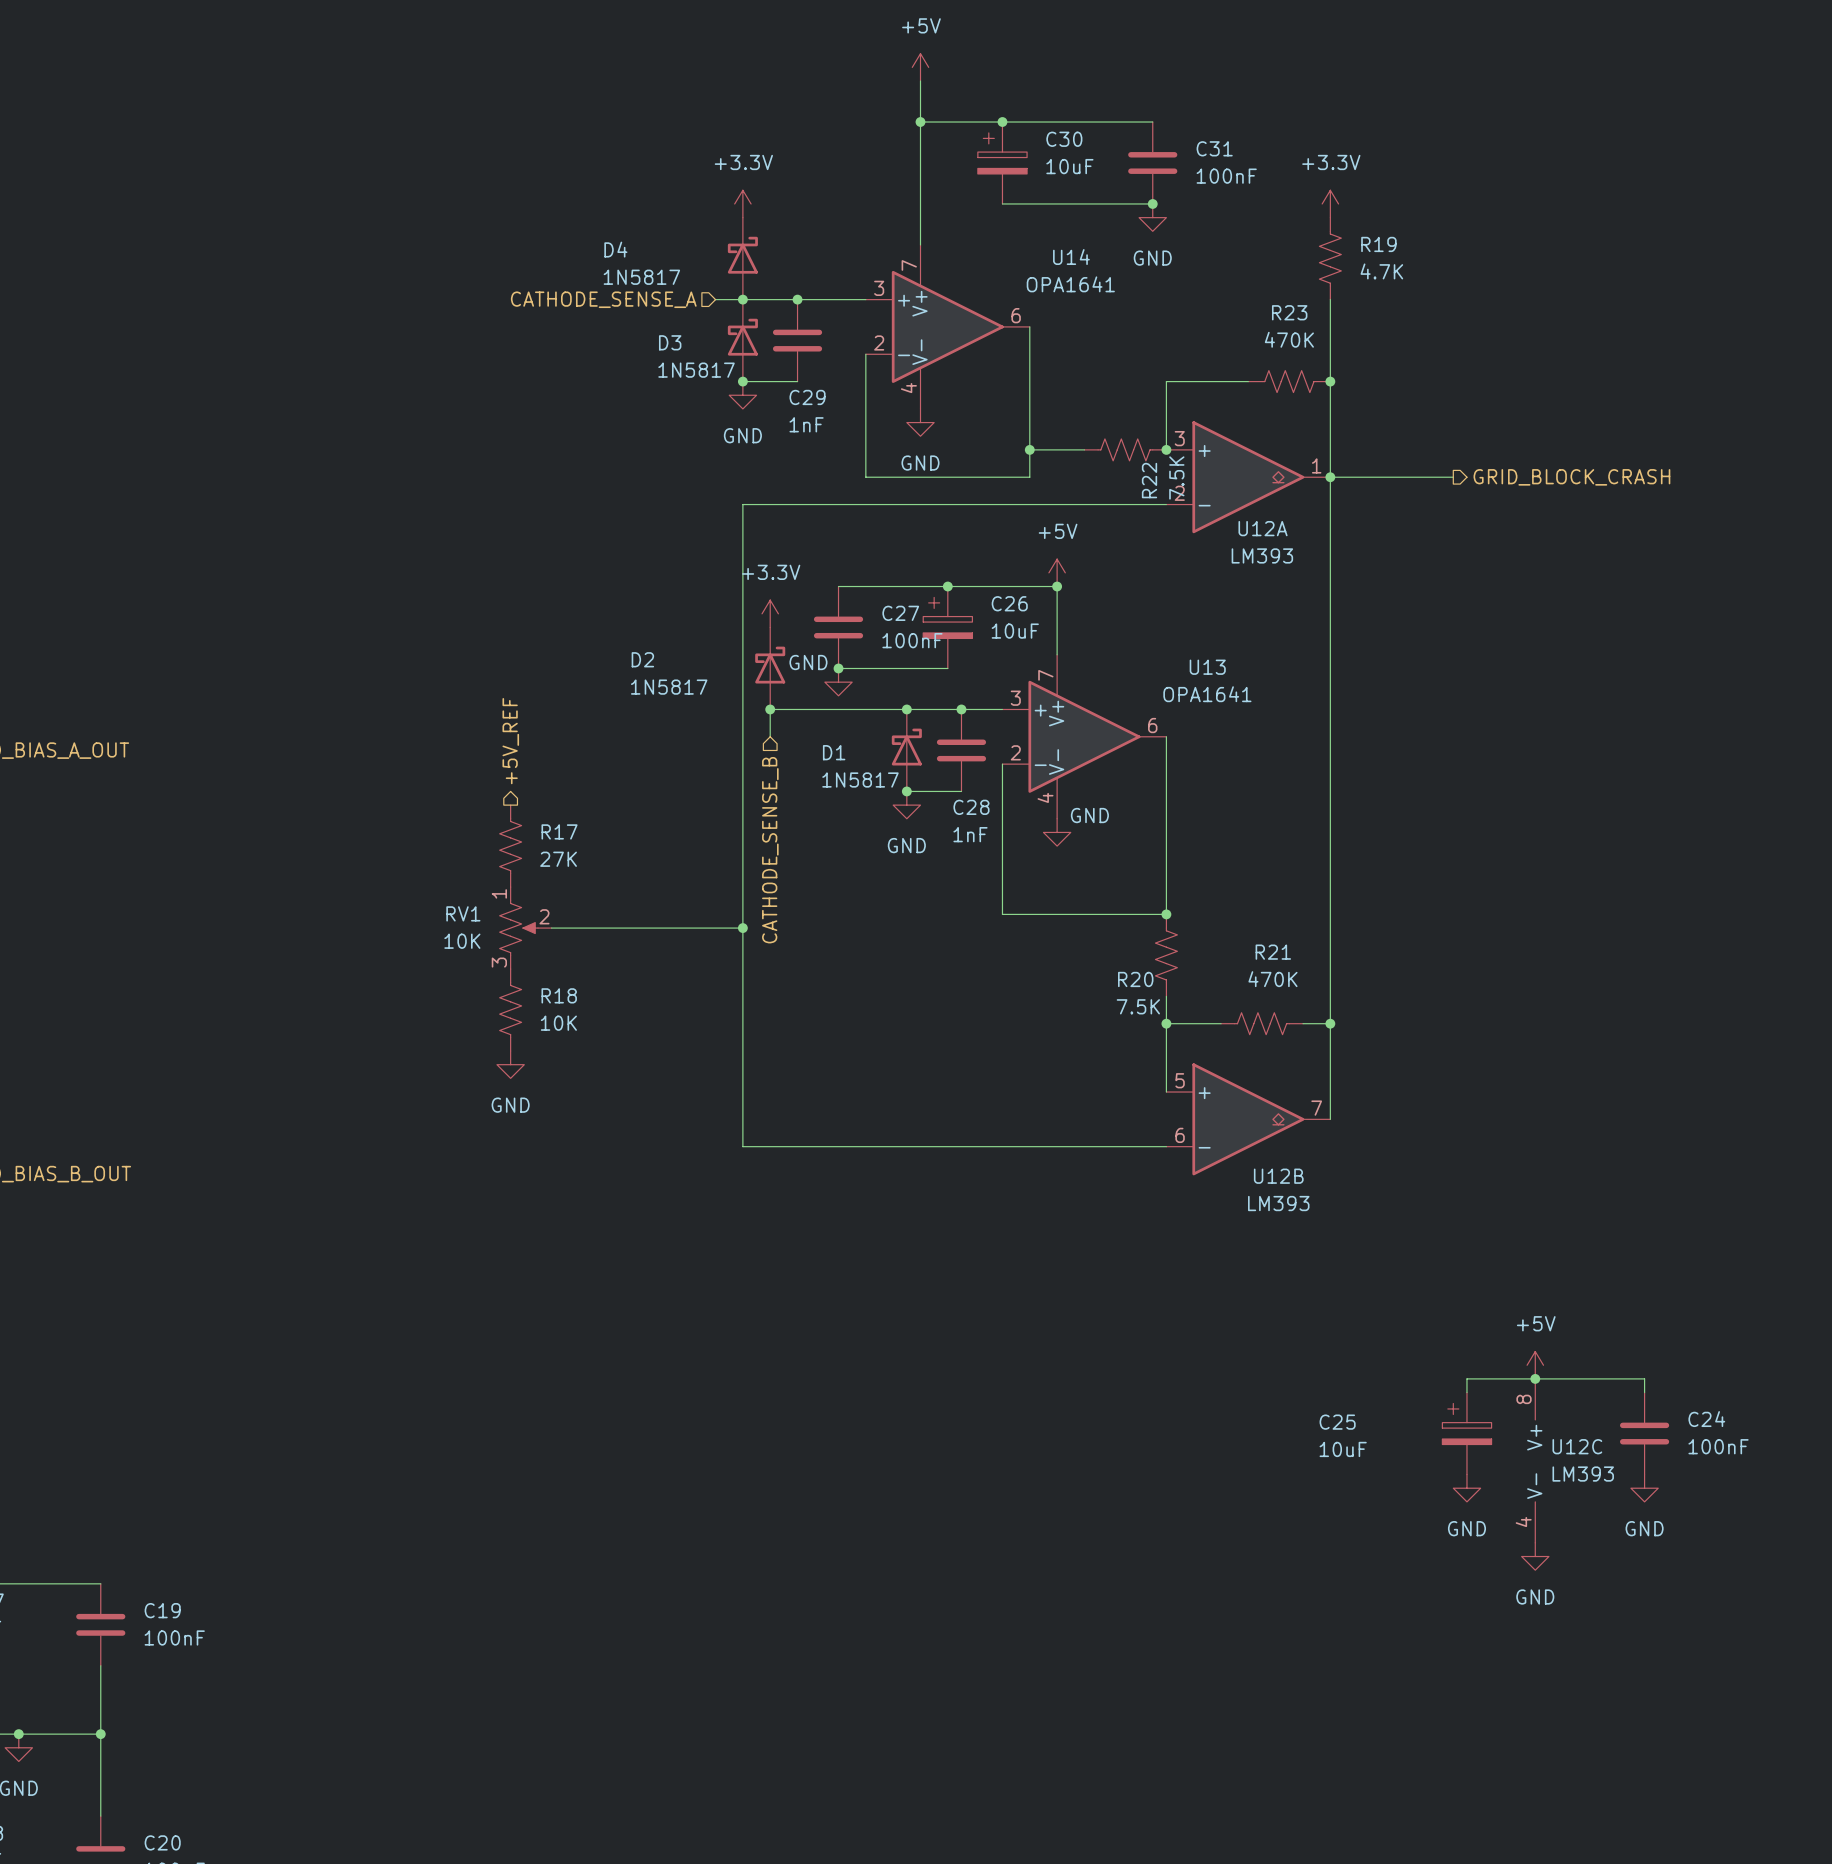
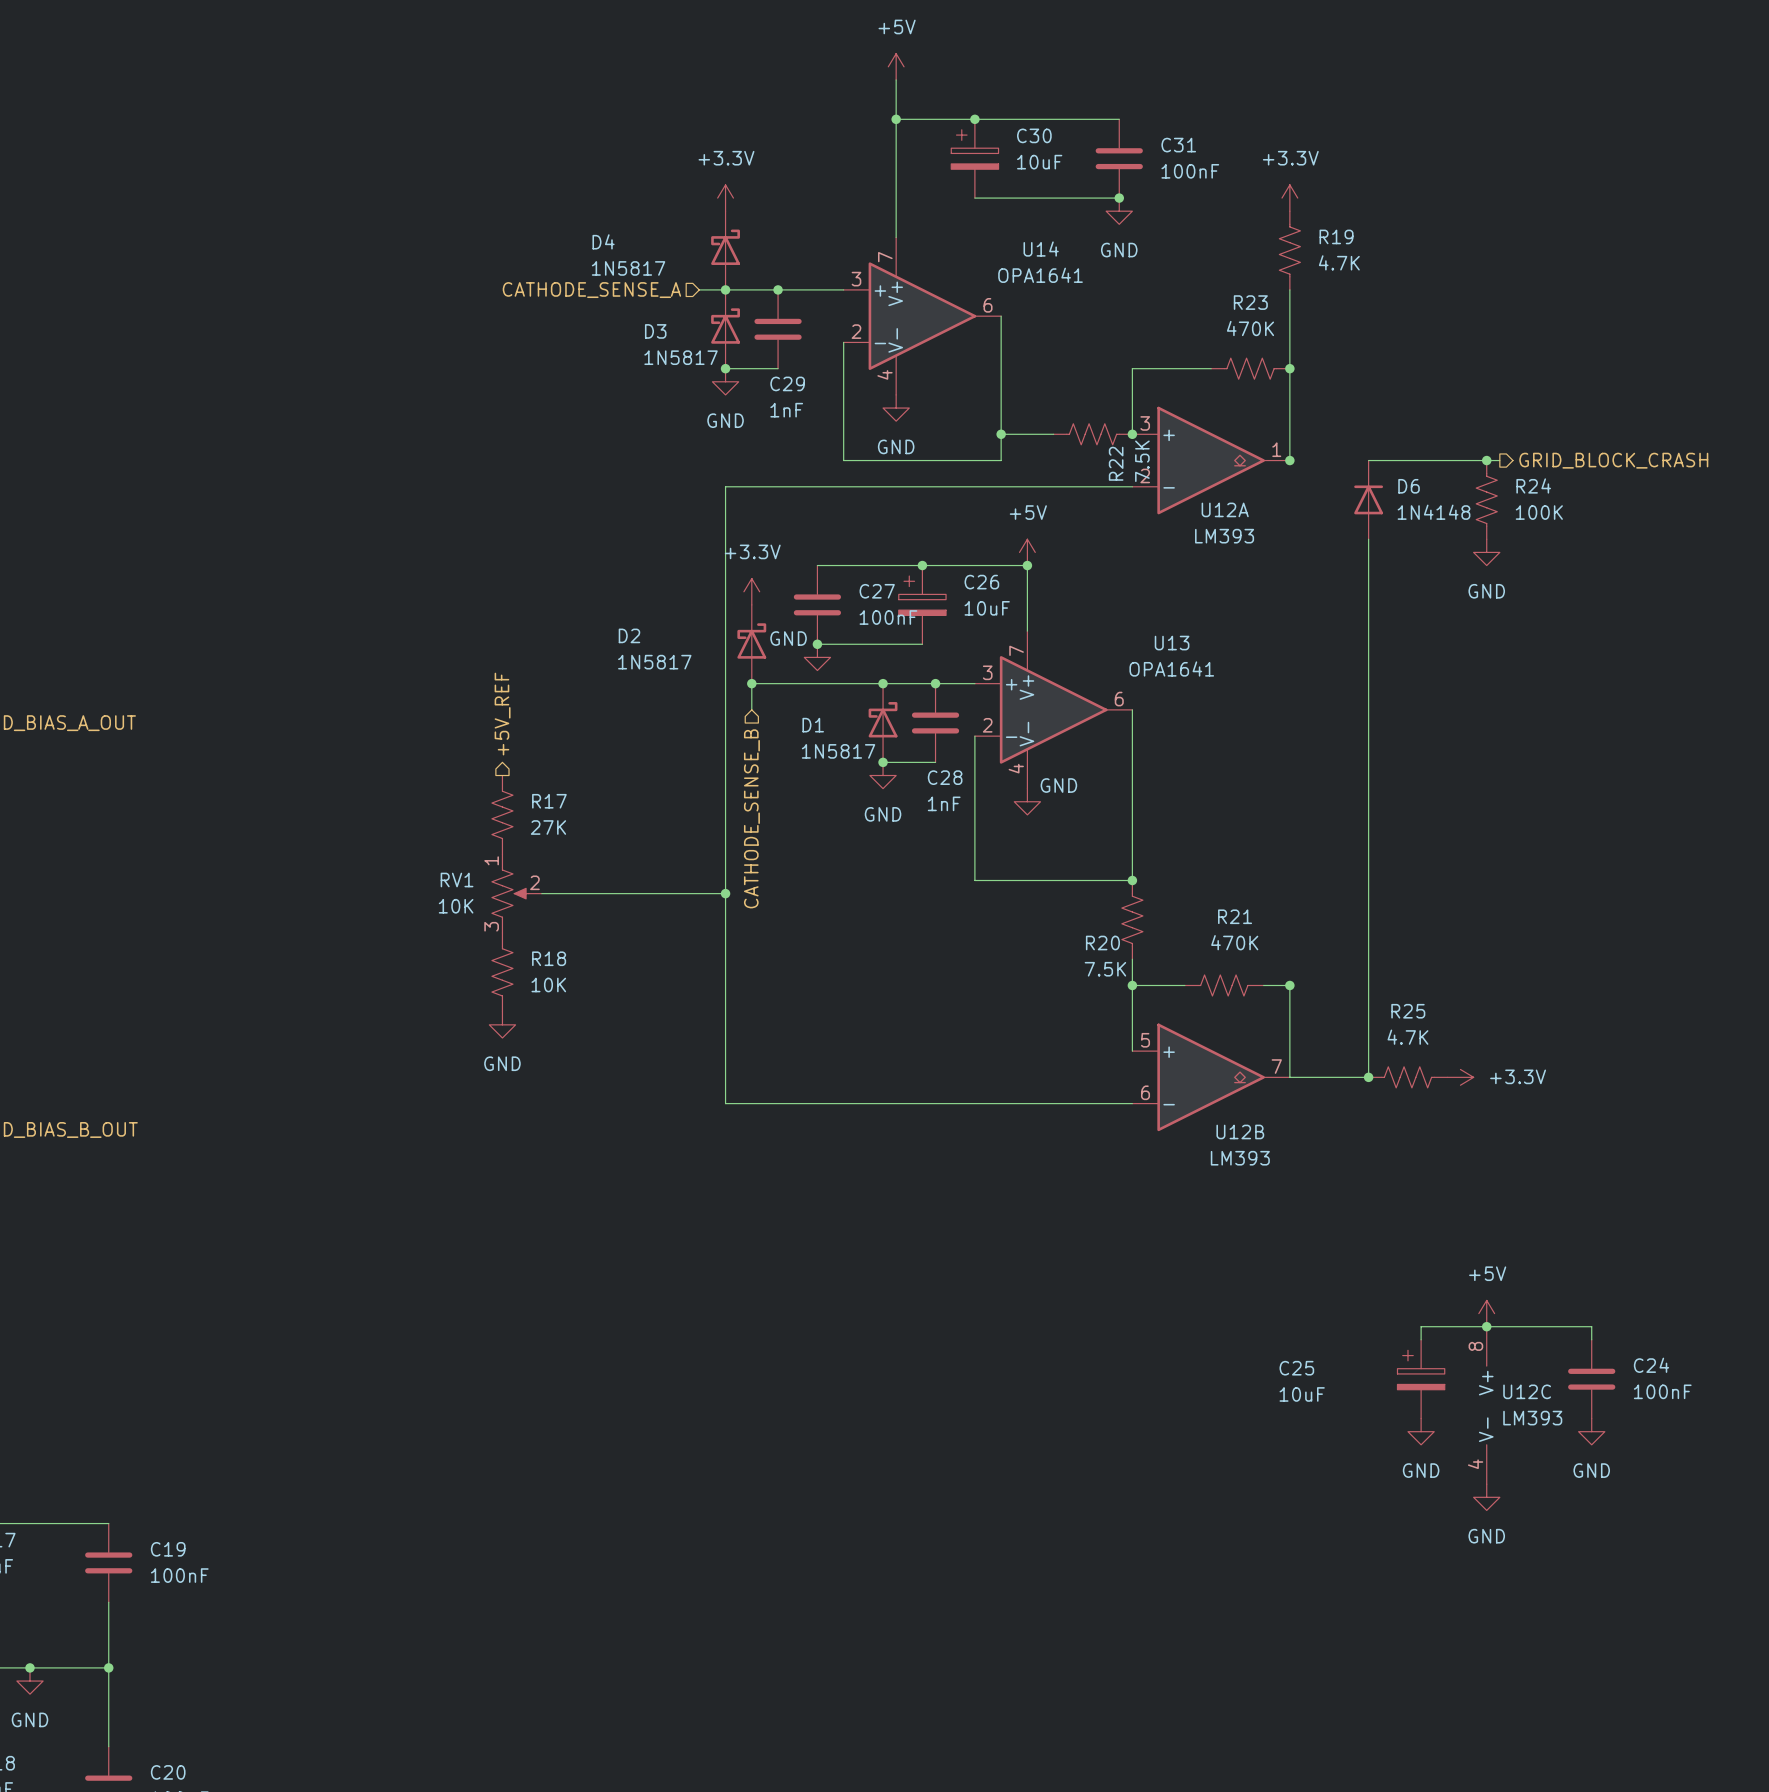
wire: (1412, 477) (1330, 477) (1330, 1023) -> none
wire: none -> (1407, 460) (1499, 460)
junction: none -> (1486, 460)
hierarchical label position: GRID_BLOCK_CRASH (1571, 477) -> GRID_BLOCK_CRASH (1613, 460)
D6: none -> 1N4148 (1368, 499)
R24: none -> 100K (1486, 499)
wire: none -> (1368, 539) (1368, 1077) (1289, 1077)
power symbol: none -> GND (1486, 552)
junction: none -> (1368, 1077)
R25: none -> 4.7K (1407, 1077)
power symbol: none -> +3.3V (1460, 1077)

